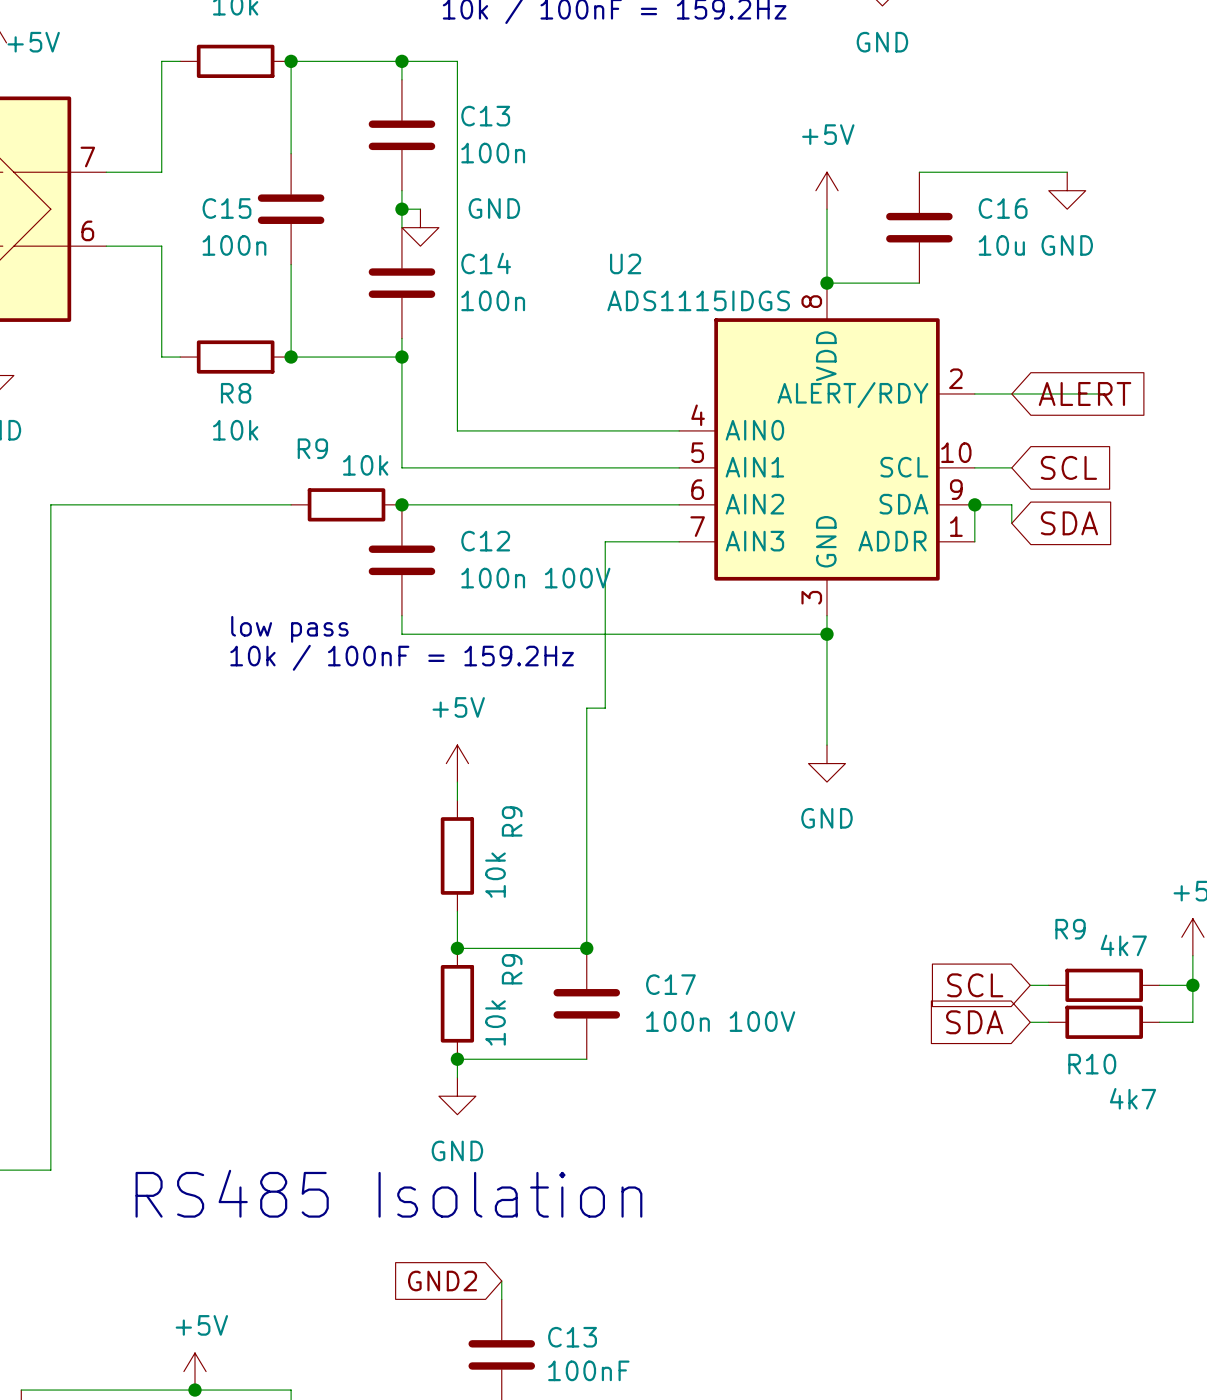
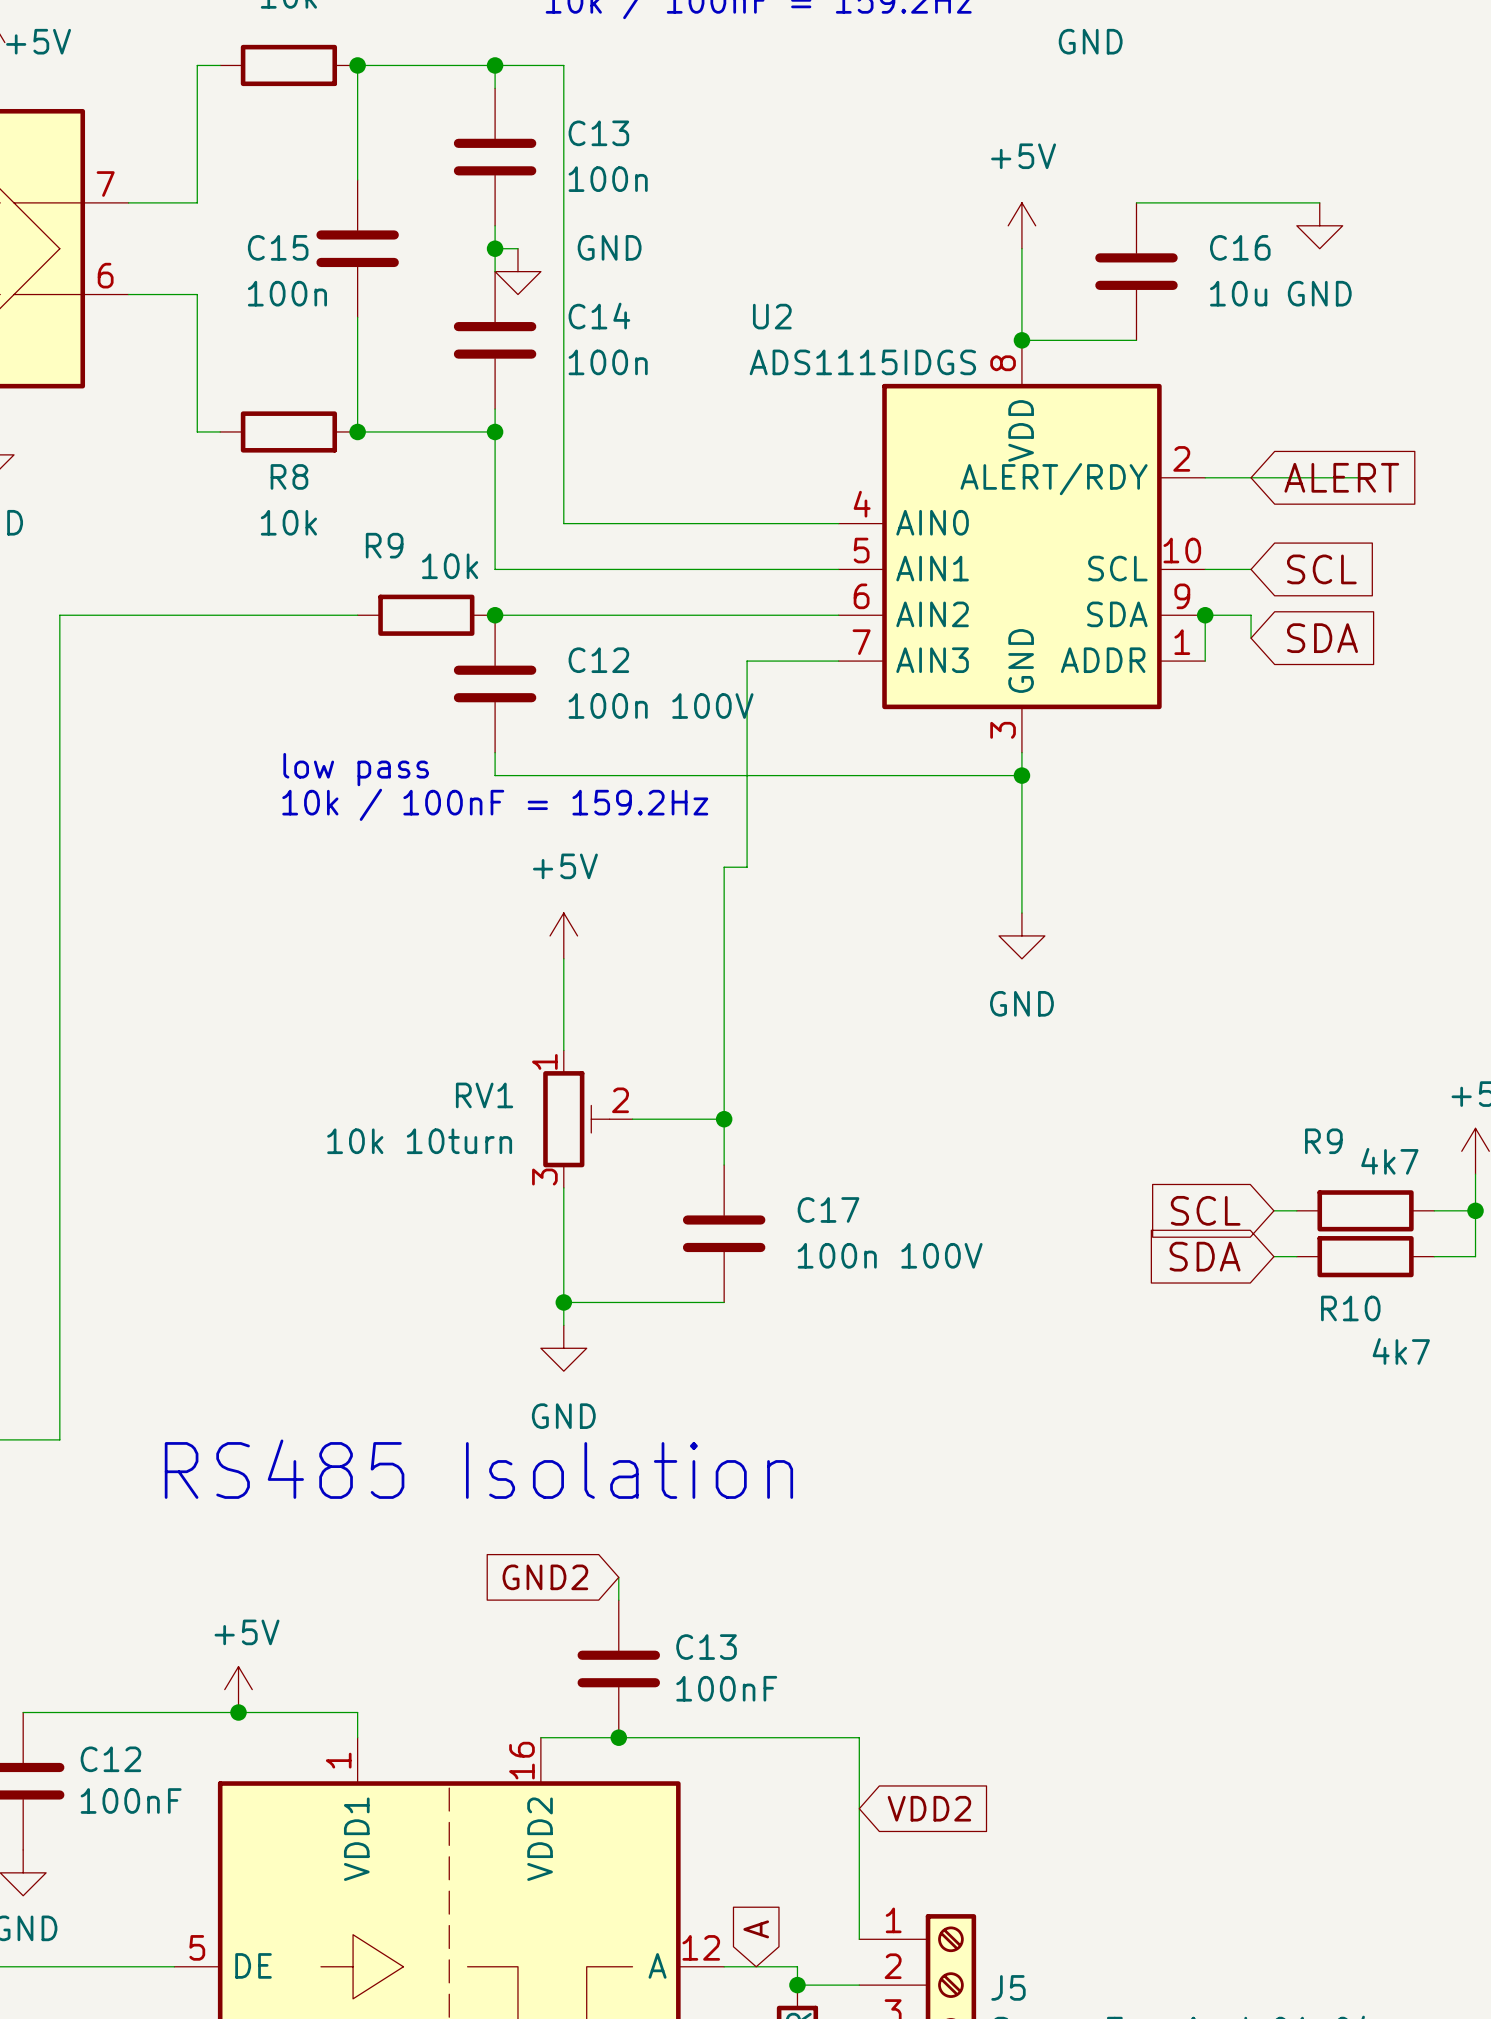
wire: none -> (563, 981) (563, 1050)
R9: 10k (457, 855) -> none
wire: (457, 911) (457, 948) (586, 948) -> none
RV1: none -> 10k 10turn (587, 1119)
wire: none -> (632, 1119) (724, 1119)
junction: (457, 948) -> none
junction position: (586, 948) -> (724, 1119)
wire: none -> (563, 1187) (563, 1302)
R9: 10k (457, 1003) -> none

